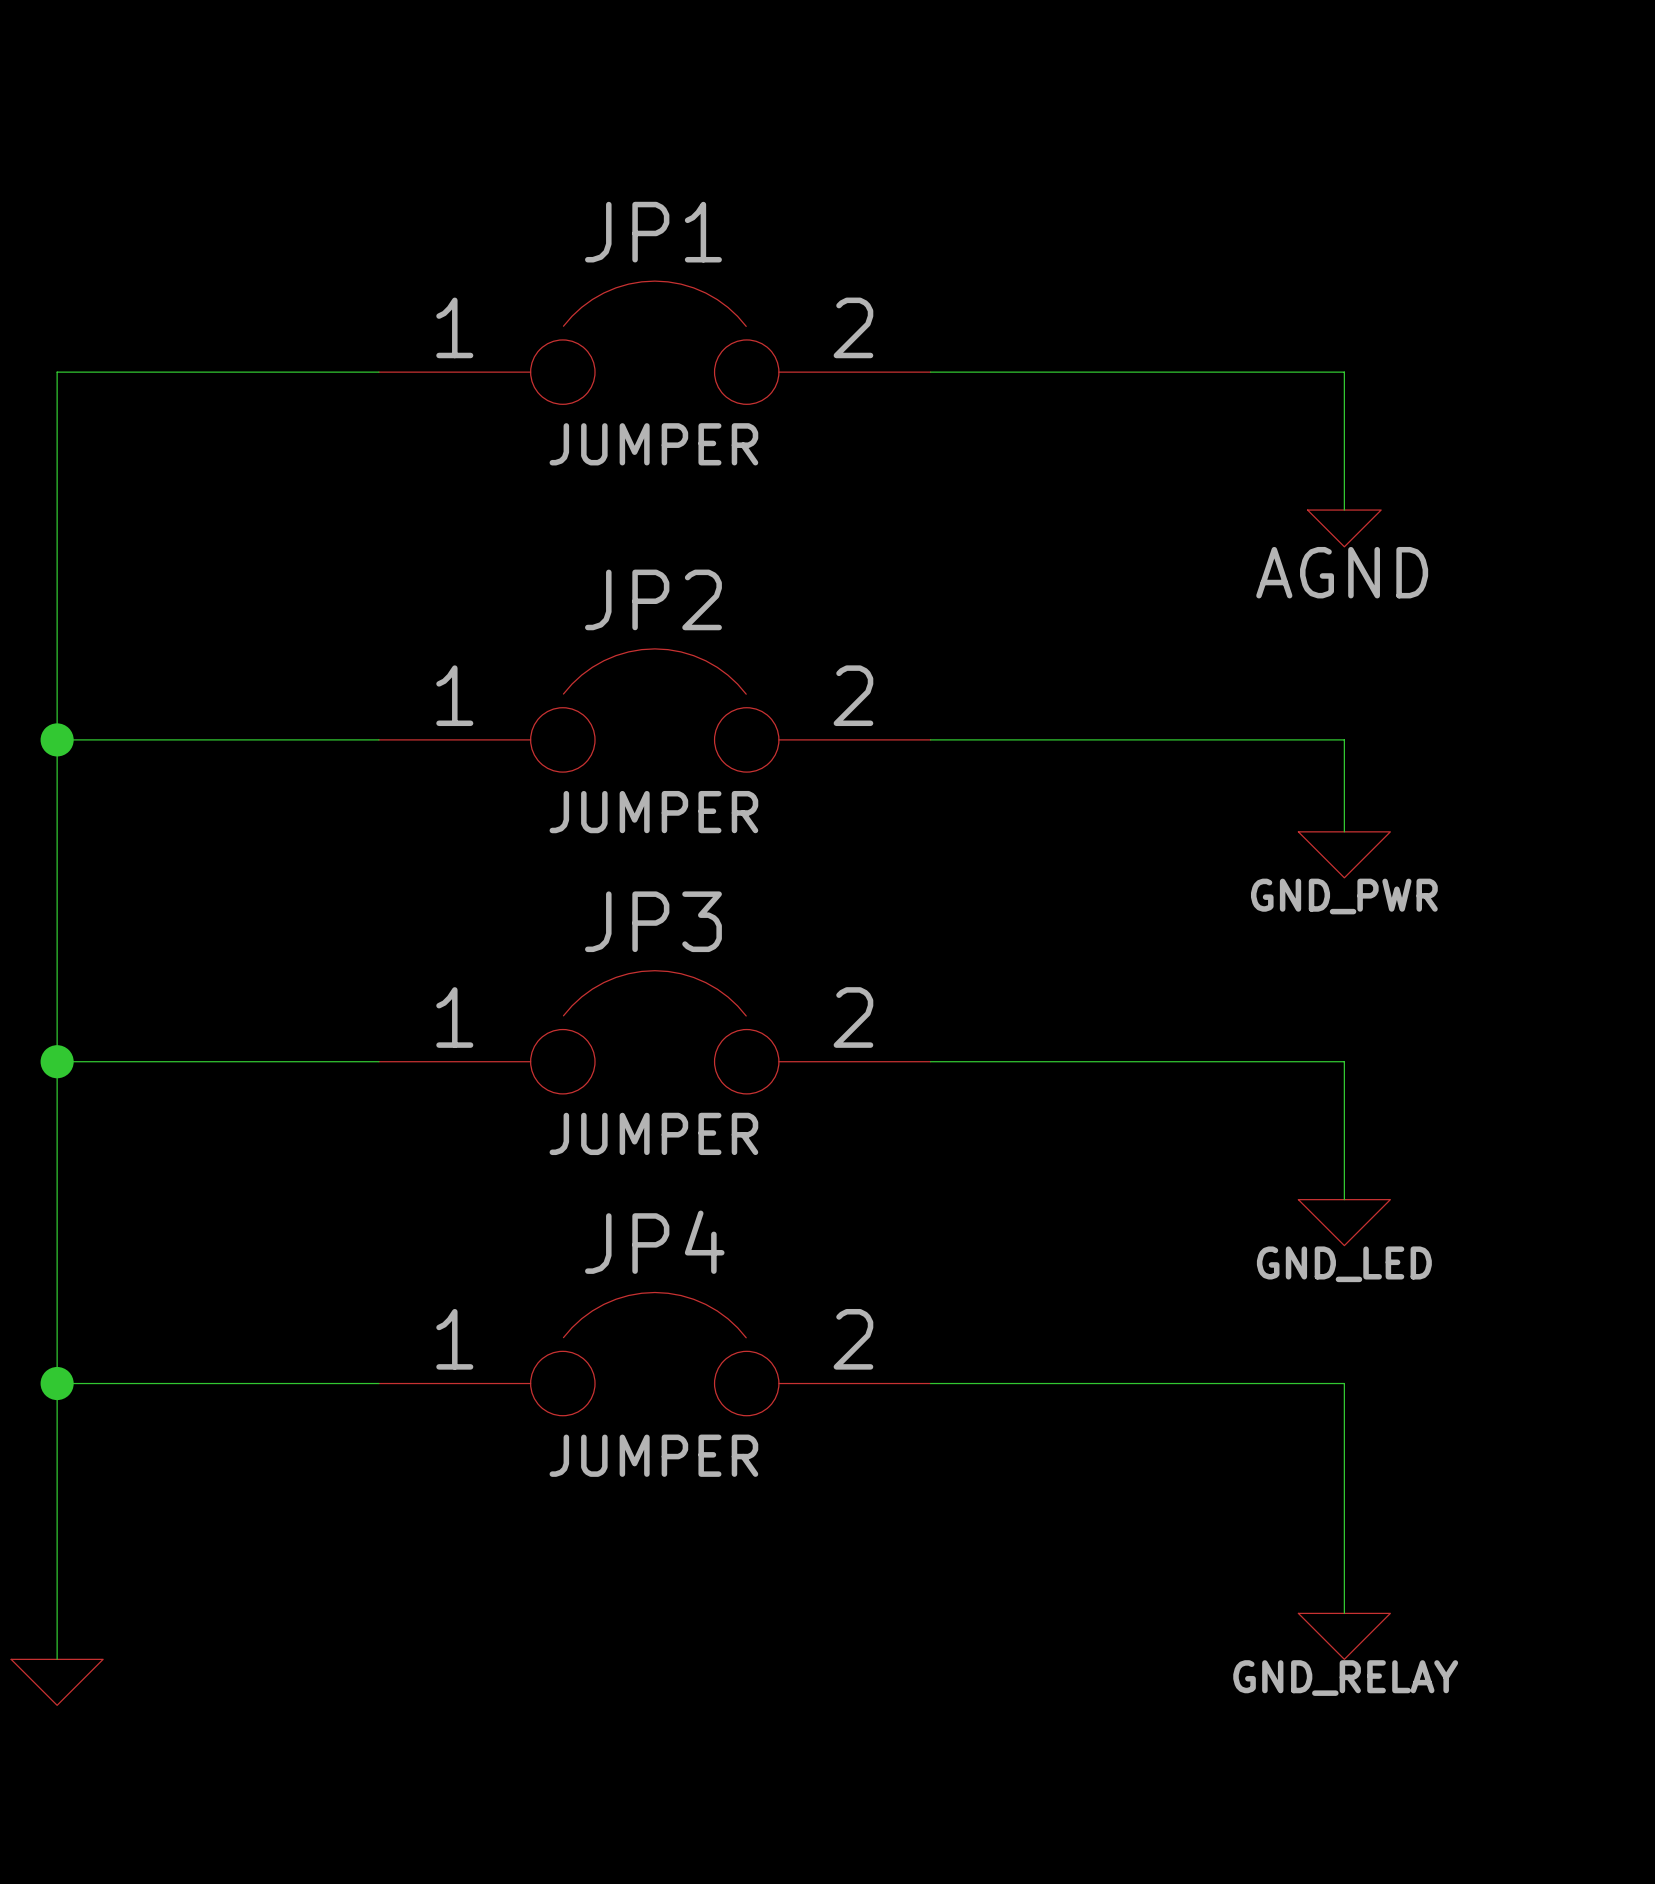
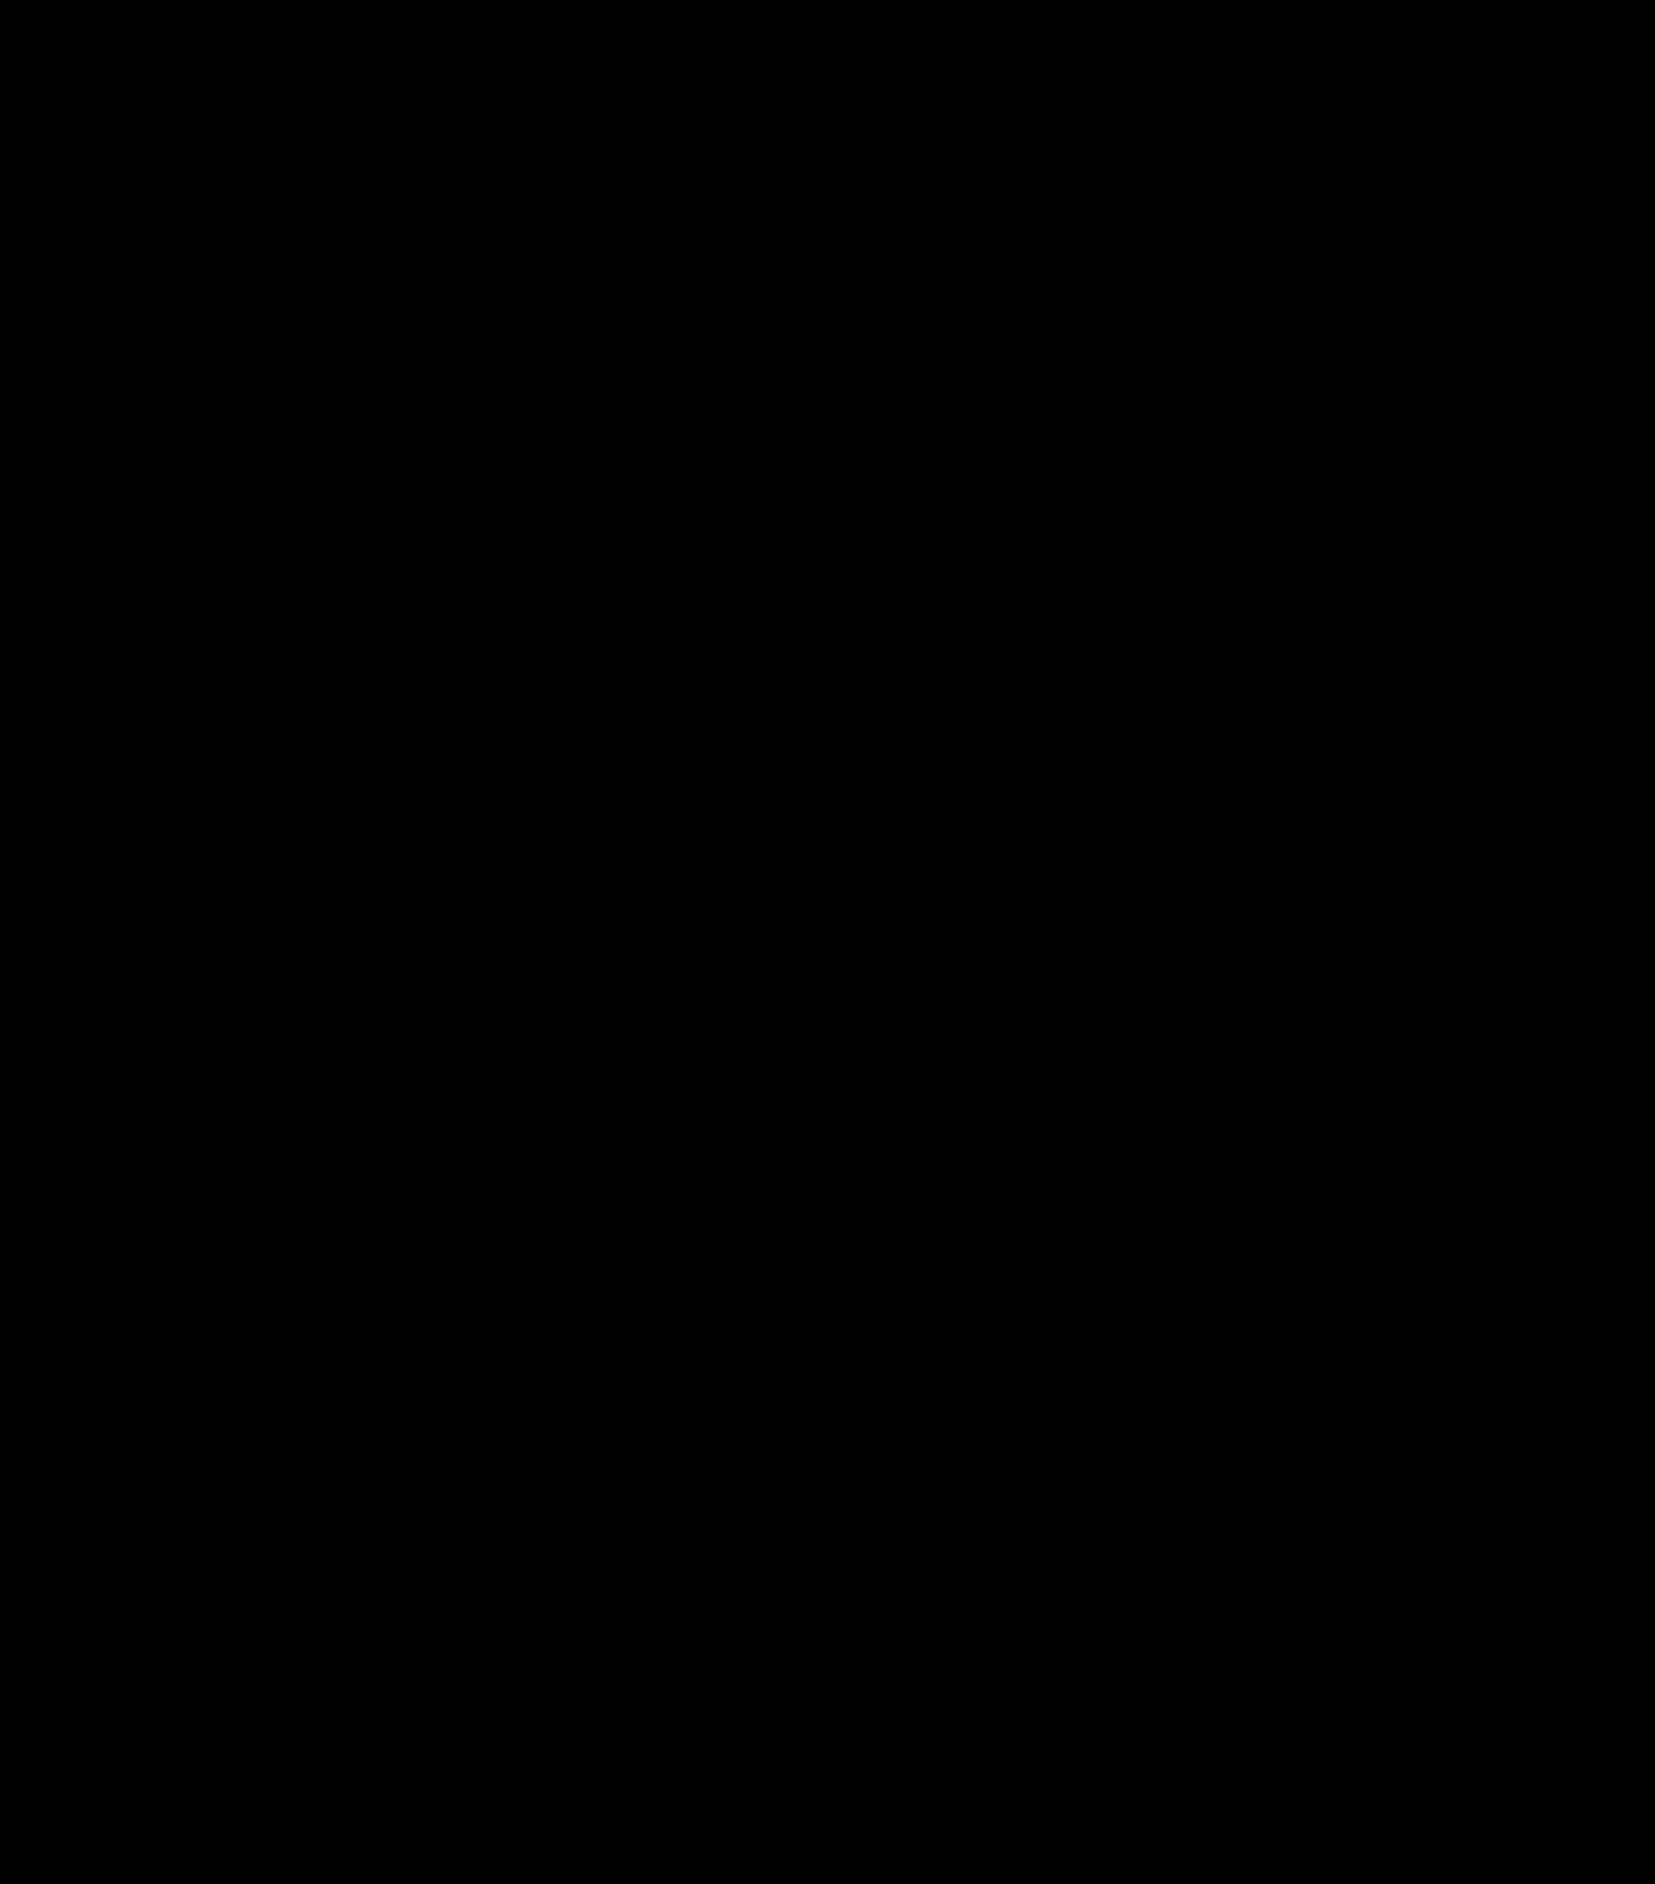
JP1: JUMPER (654, 342) -> none
wire: (378, 372) (57, 372) (57, 1659) -> none
wire: (930, 372) (1344, 372) (1344, 510) -> none
power symbol: AGND (1344, 528) -> none
JP2: JUMPER (654, 710) -> none
wire: (57, 739) (378, 739) -> none
junction: (57, 739) -> none
wire: (930, 739) (1344, 739) (1344, 831) -> none
power symbol: GND_PWR (1344, 854) -> none
JP3: JUMPER (654, 1032) -> none
wire: (57, 1061) (378, 1061) -> none
junction: (57, 1061) -> none
wire: (930, 1061) (1344, 1061) (1344, 1199) -> none
power symbol: GND_LED (1344, 1222) -> none
JP4: JUMPER (654, 1354) -> none
wire: (57, 1383) (378, 1383) -> none
junction: (57, 1383) -> none
wire: (930, 1383) (1344, 1383) (1344, 1613) -> none
power symbol: GND_RELAY (1344, 1636) -> none
power symbol: (57, 1682) -> none

